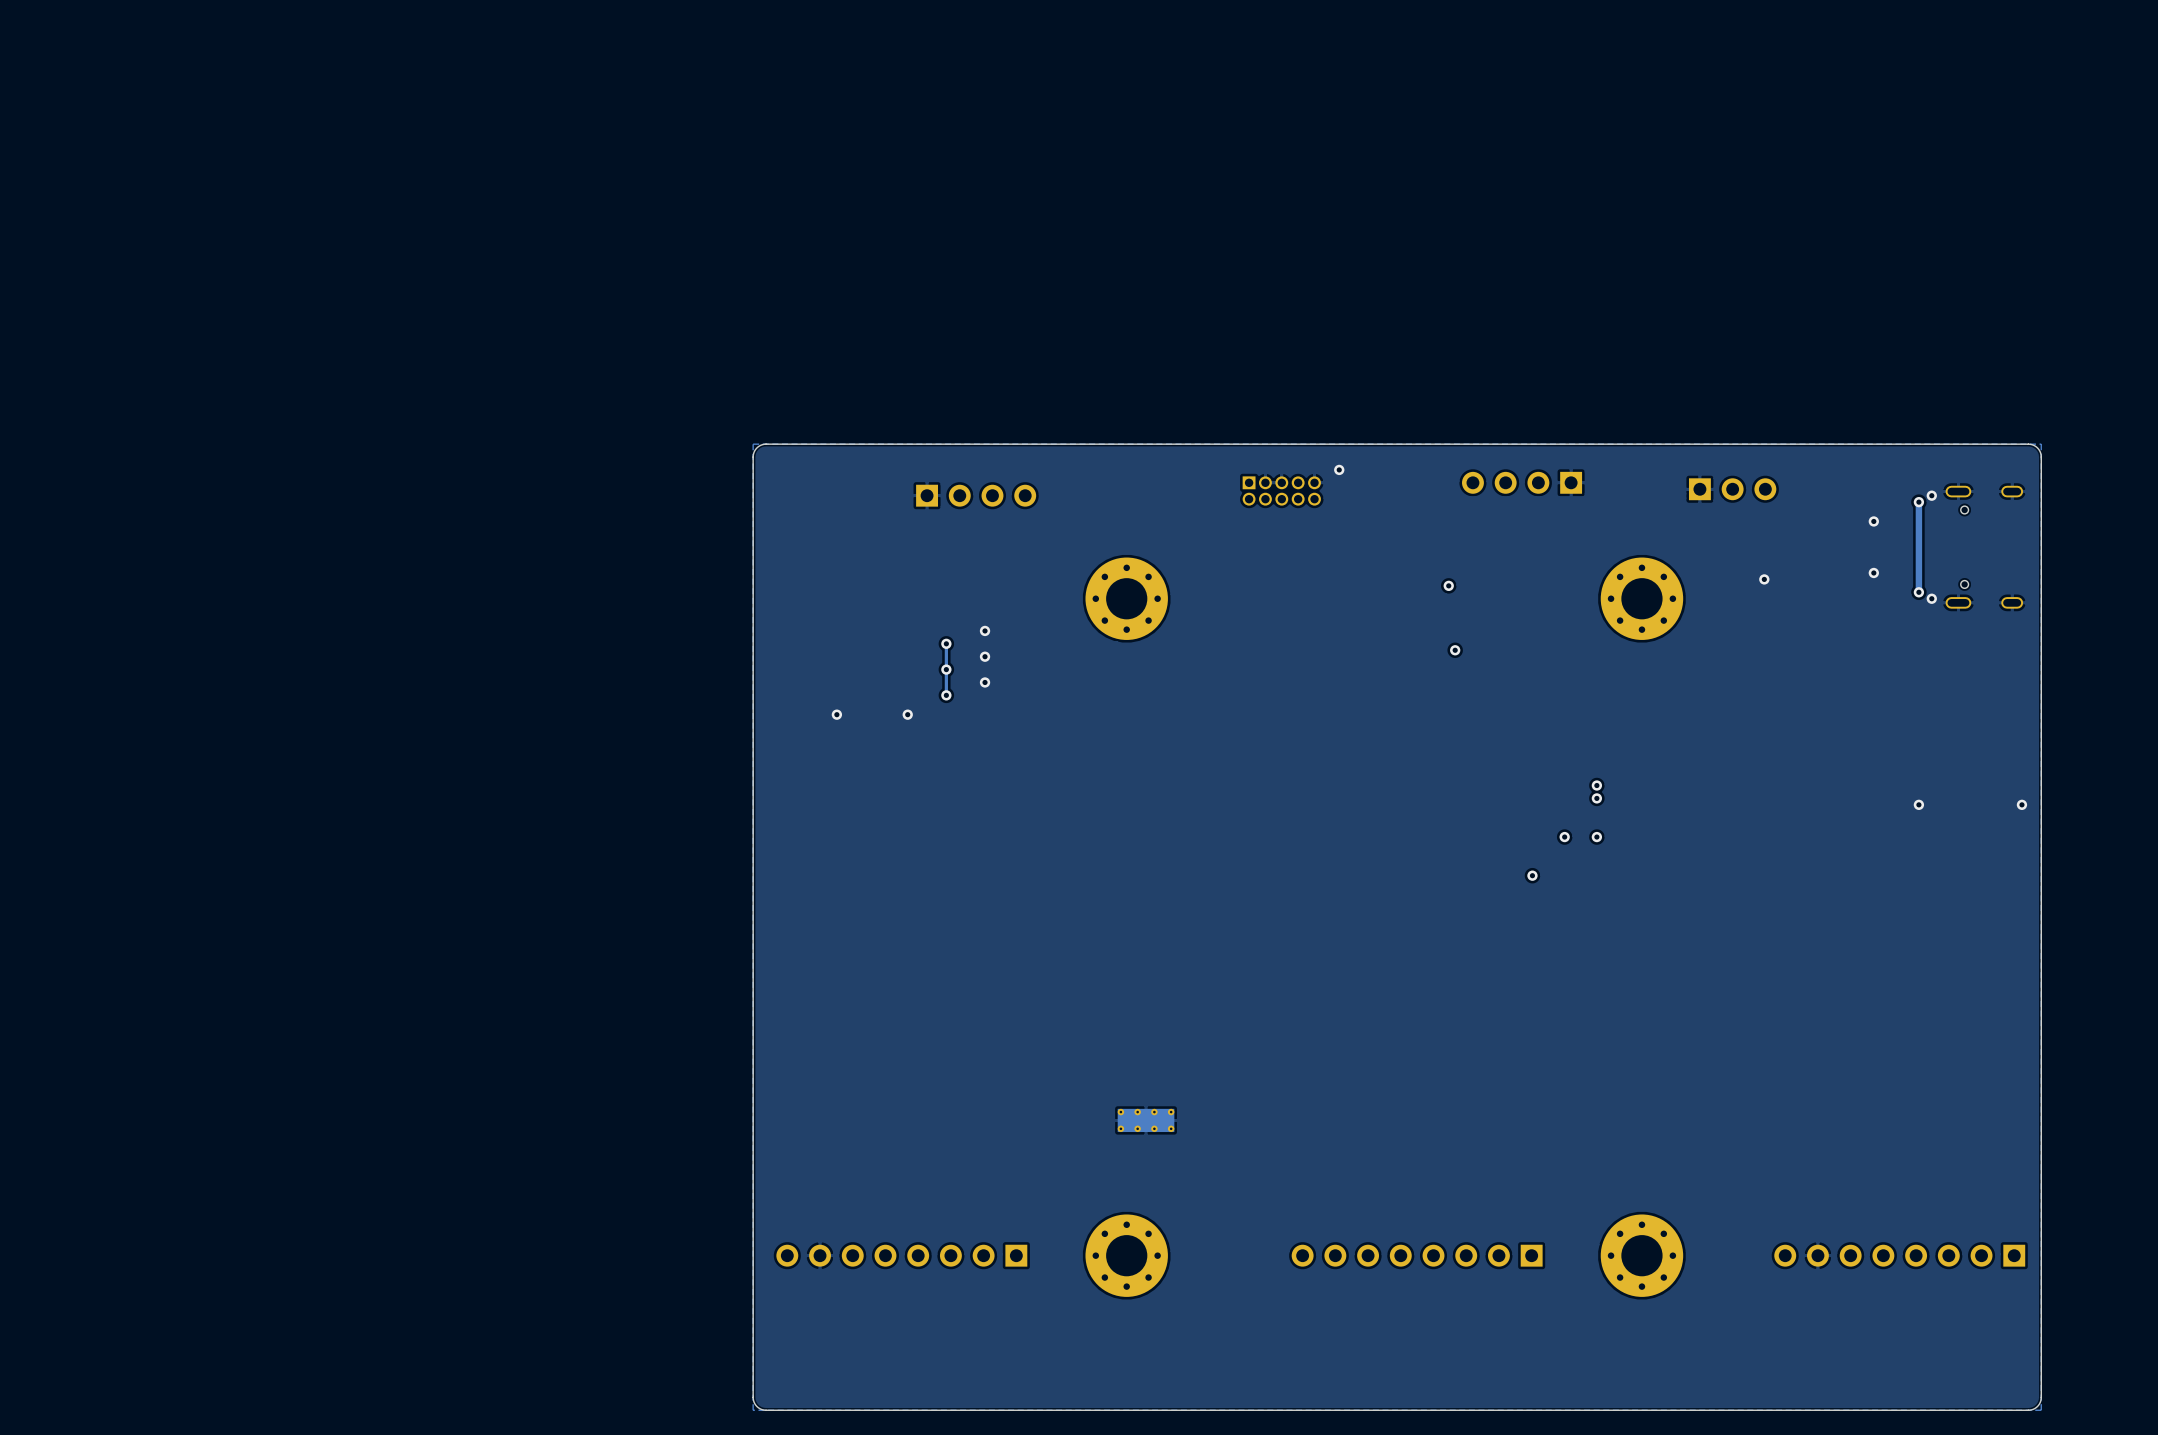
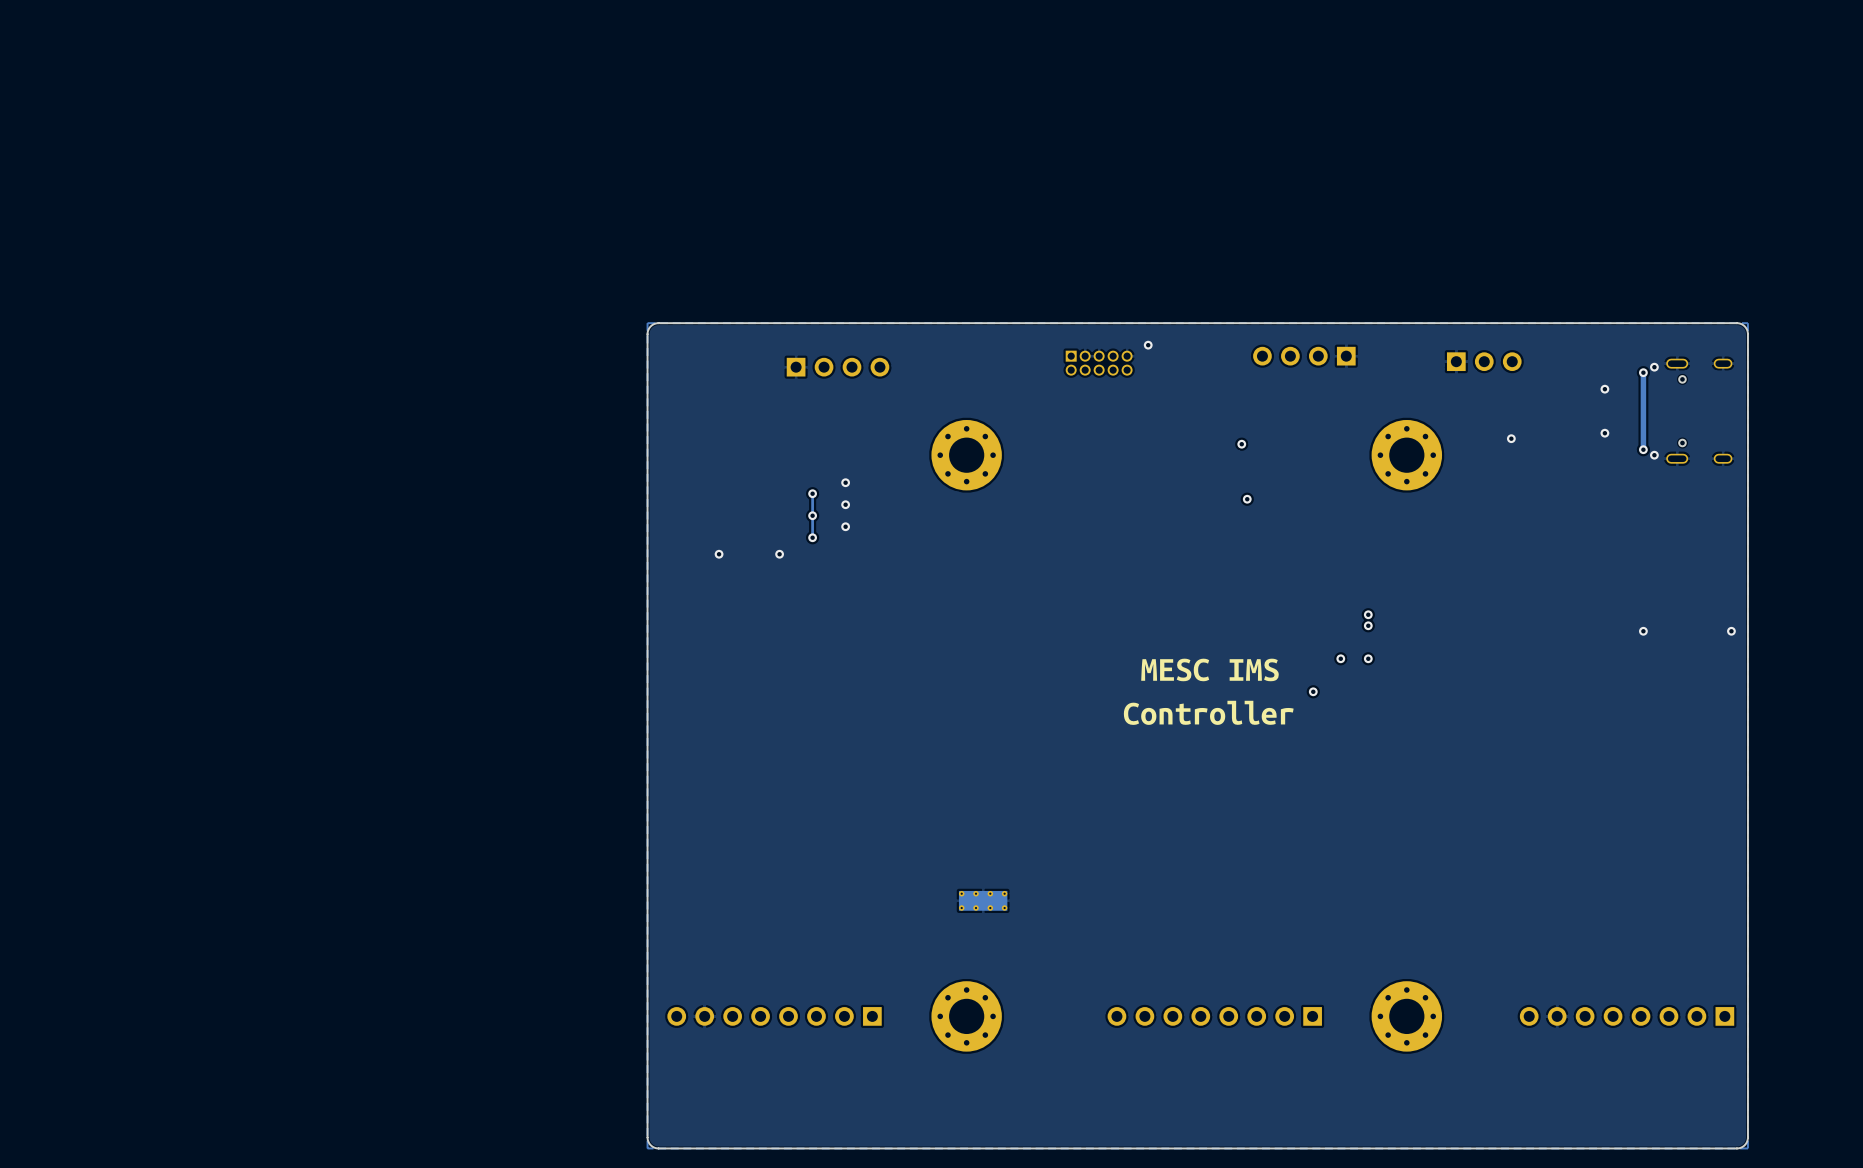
drawing: none -> [1123, 658, 1294, 725]

